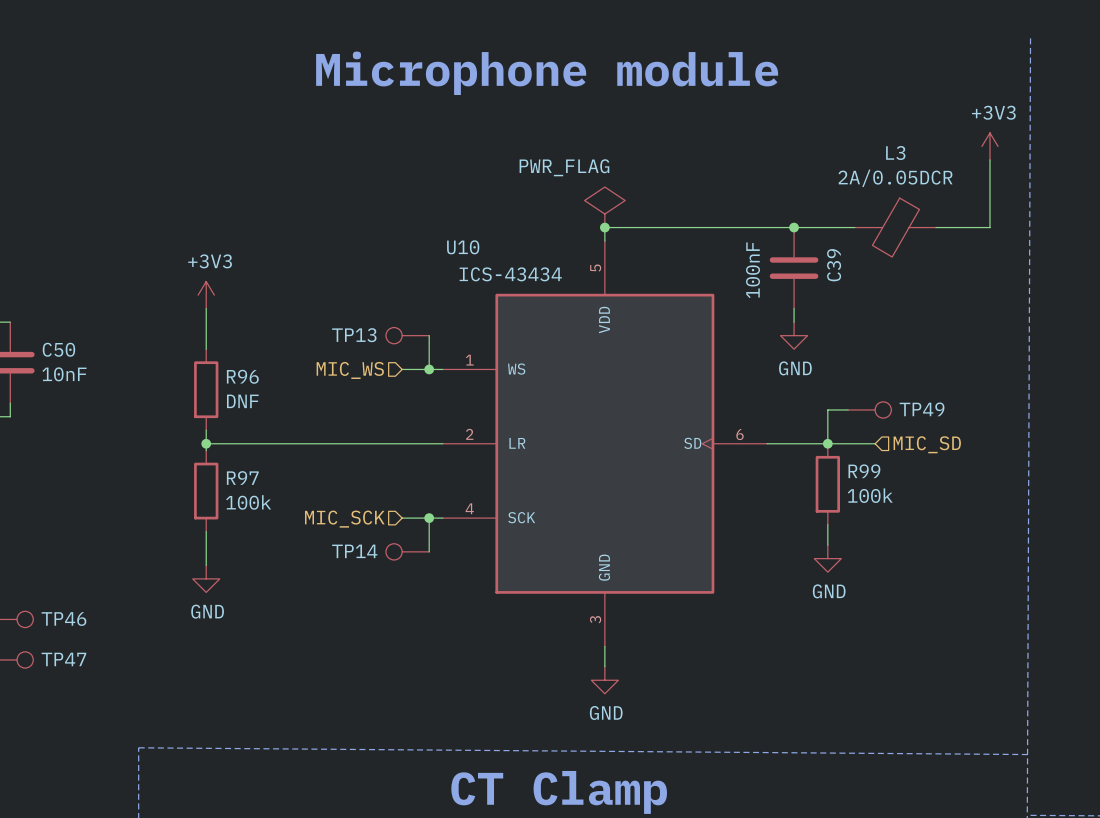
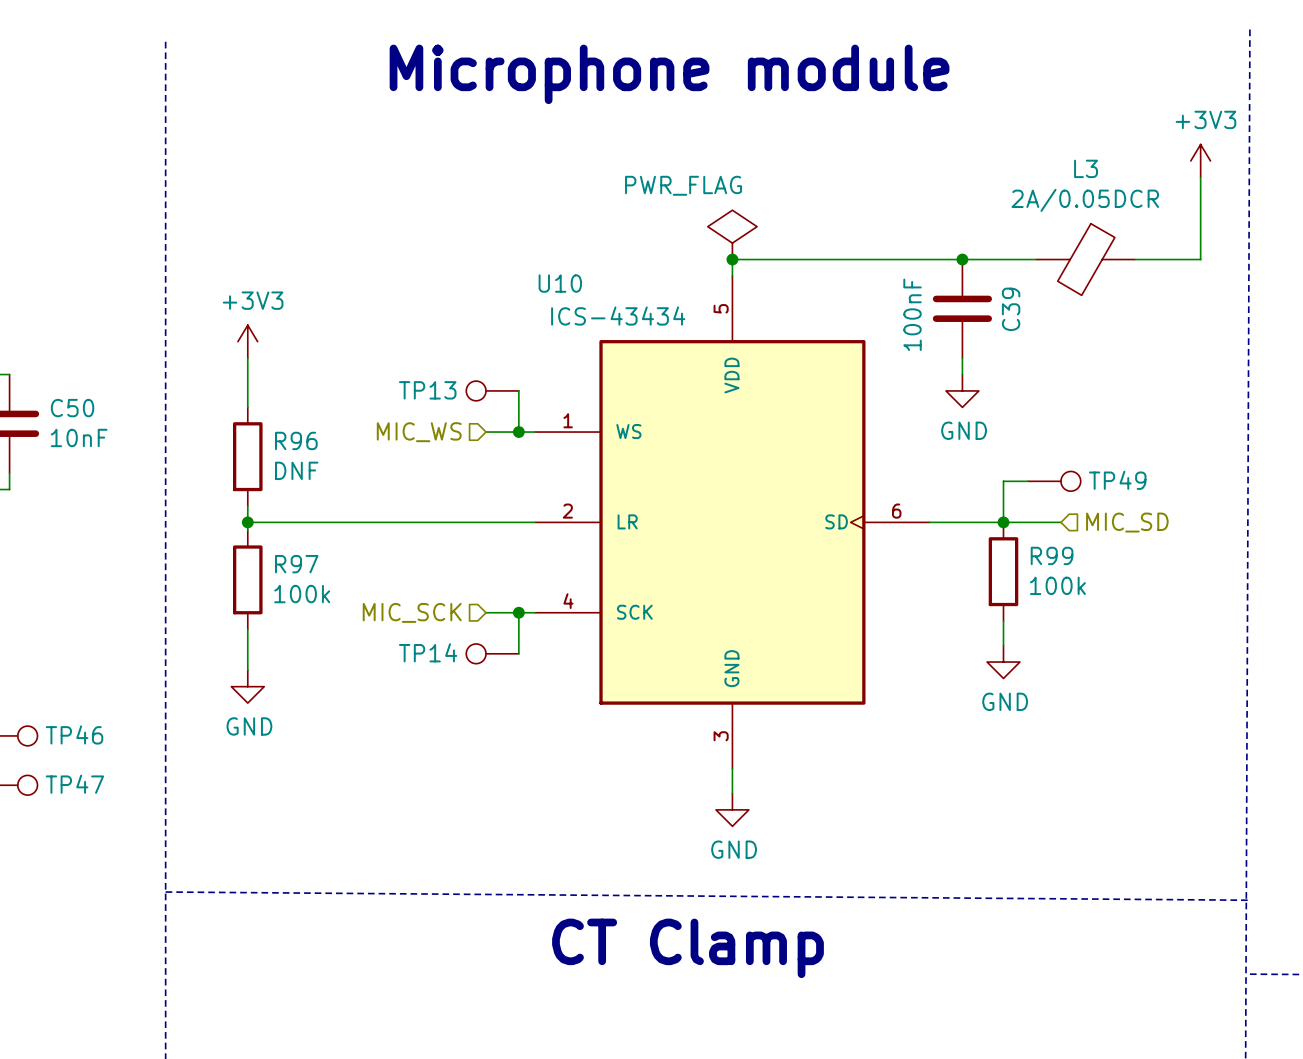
line: none -> (165, 37) (165, 892)

